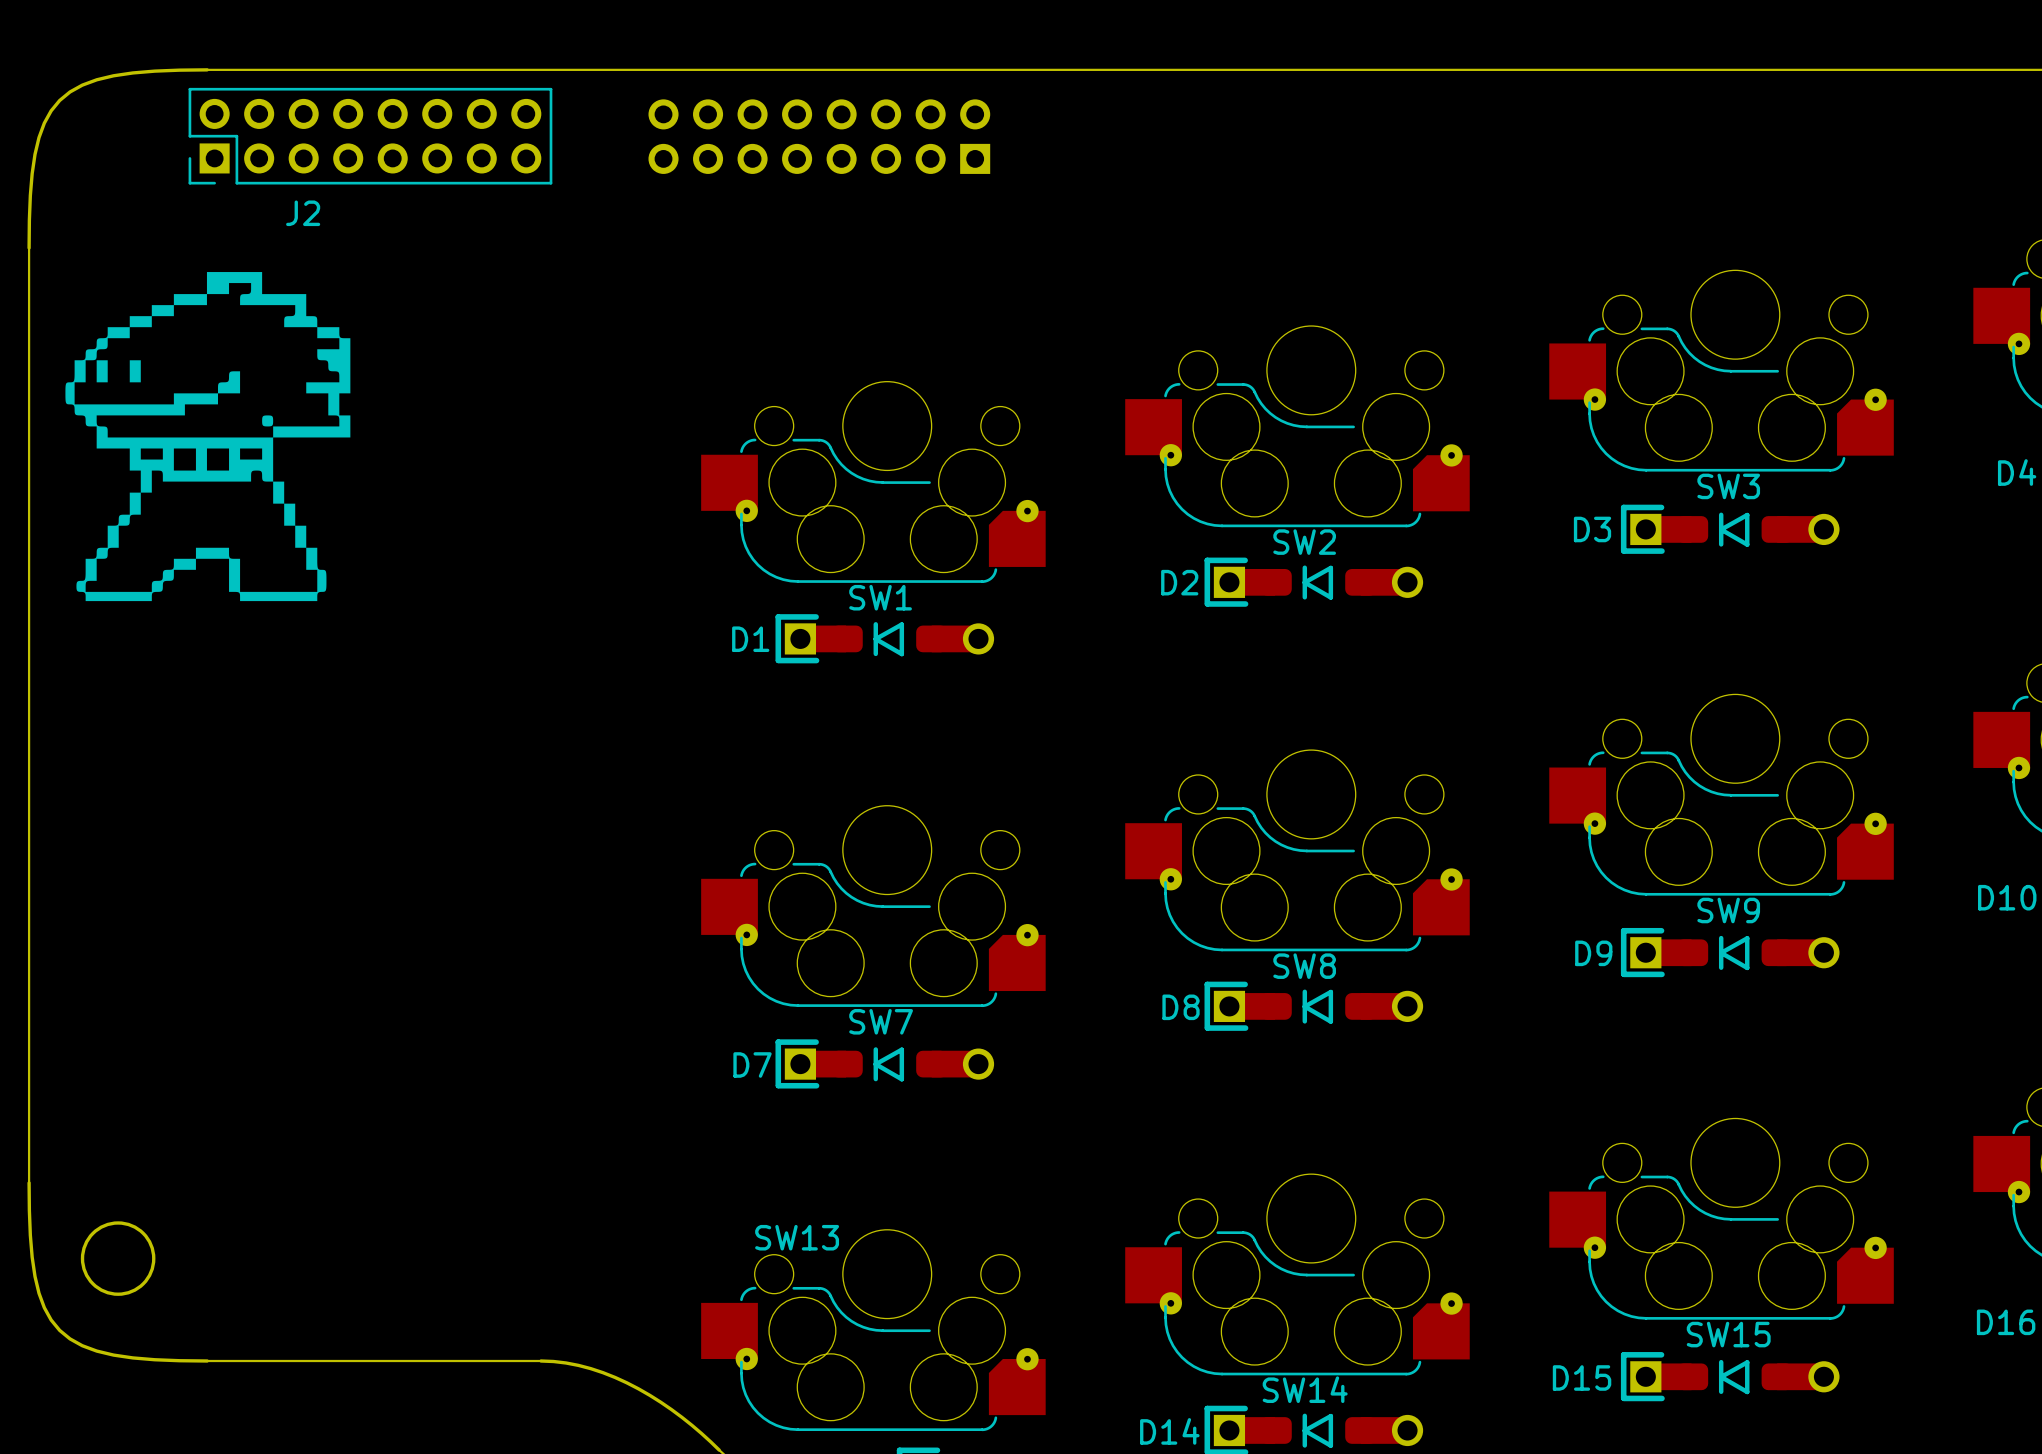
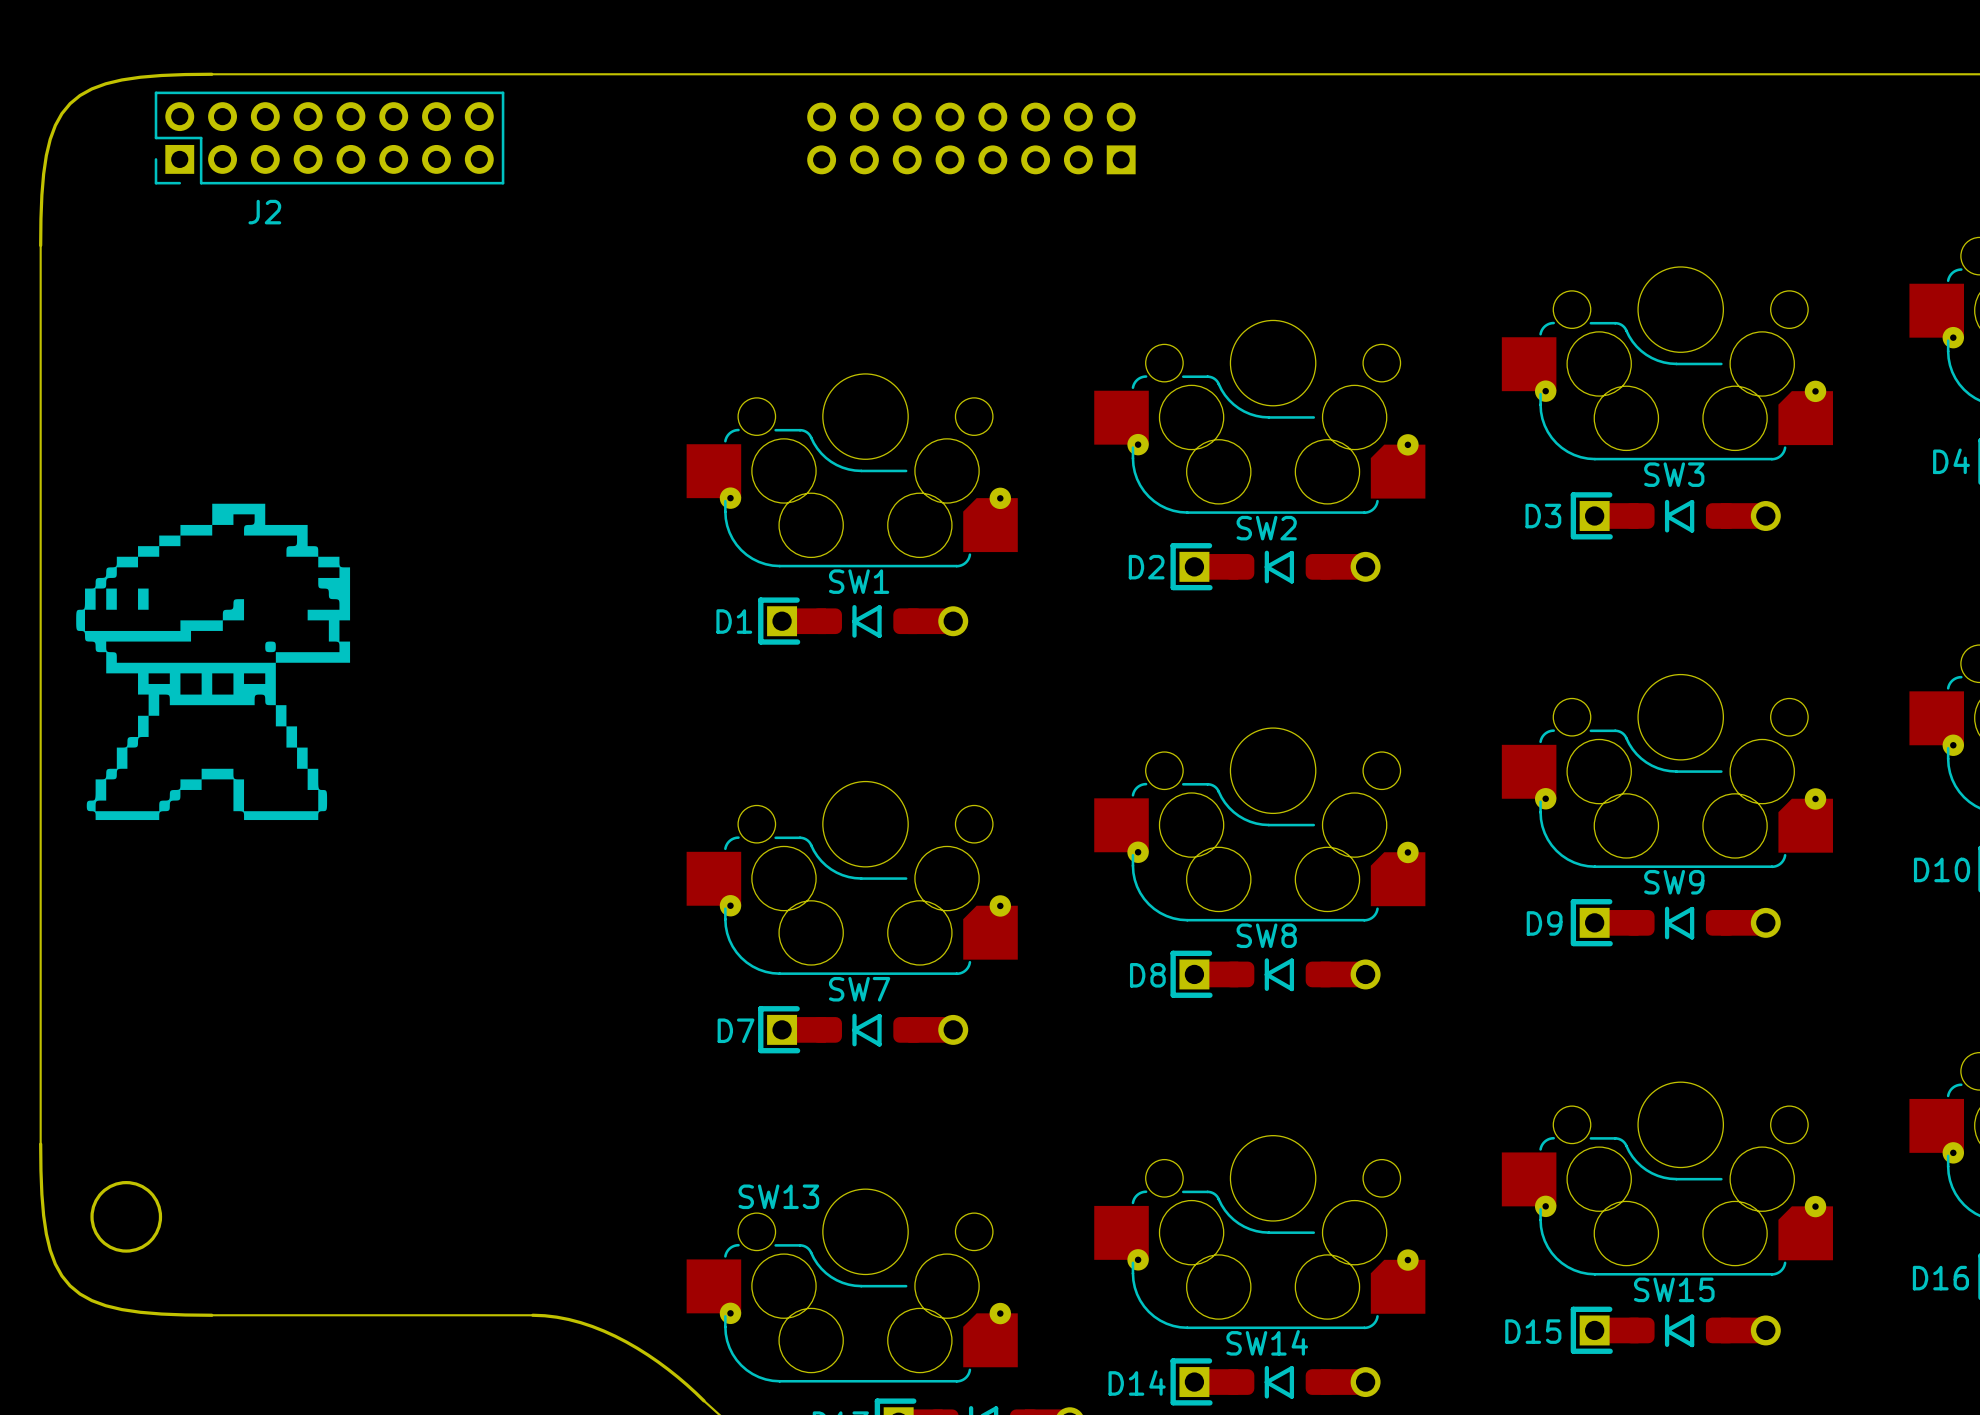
J2 position: (370, 136) -> (329, 138)
part position: (819, 136) -> (971, 138)
drawing position: (140, 321) -> (148, 551)
drawing position: (251, 354) -> (254, 583)
drawing: [96, 360, 141, 383] -> none
drawing position: (267, 420) -> (270, 646)
drawing position: (195, 464) -> (201, 688)
drawing: none -> [106, 588, 149, 610]

